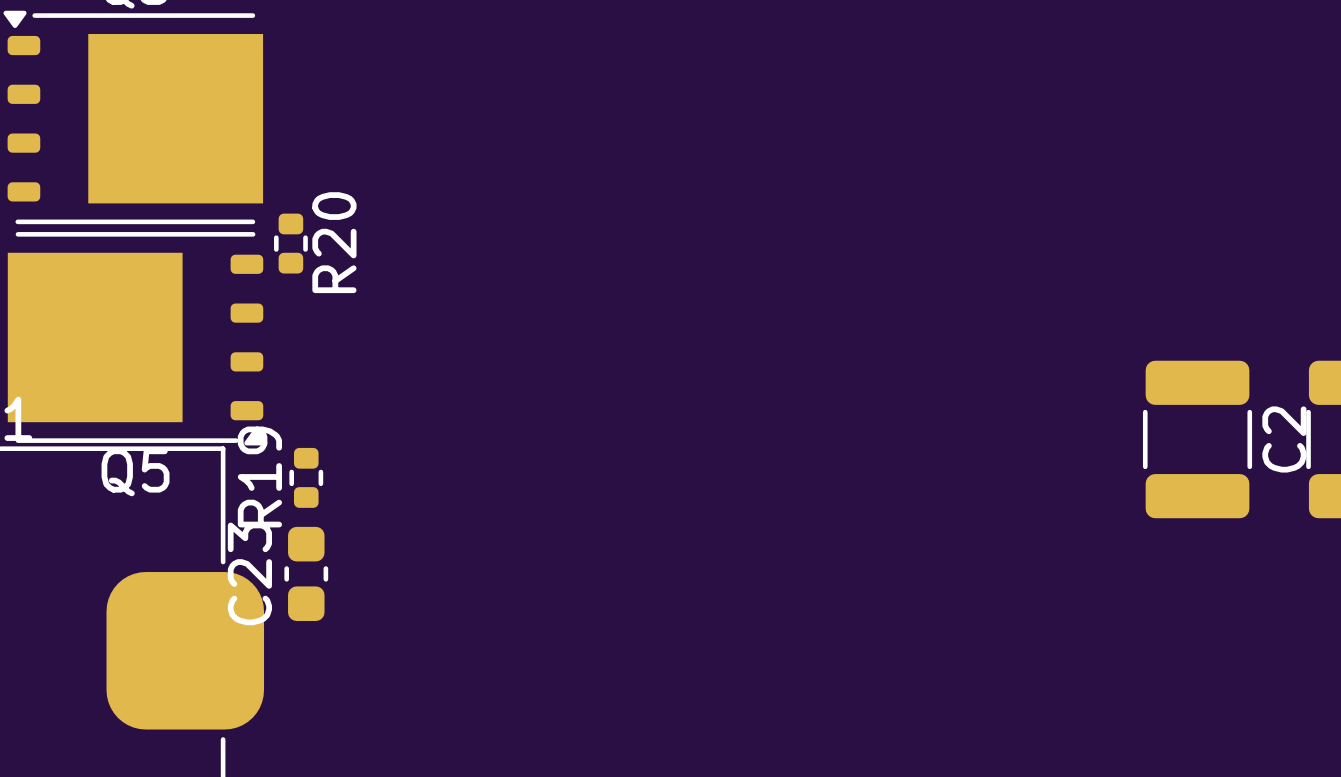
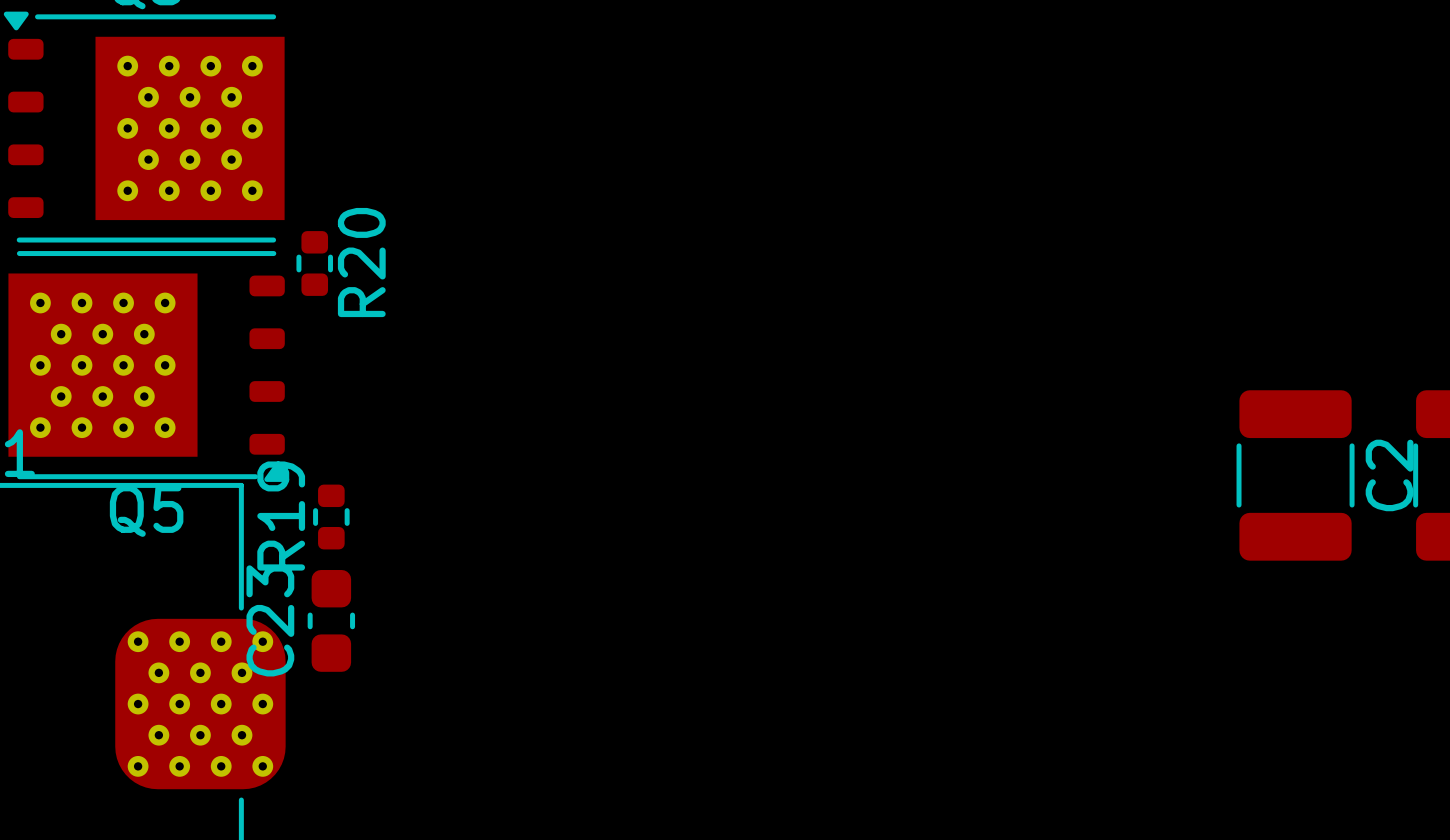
part: none -> (127, 66)
part: none -> (169, 66)
part: none -> (210, 66)
part: none -> (252, 66)
part: none -> (148, 97)
part: none -> (190, 97)
part: none -> (231, 97)
part: none -> (127, 128)
part: none -> (169, 128)
part: none -> (210, 128)
part: none -> (252, 128)
part: none -> (148, 159)
part: none -> (190, 159)
part: none -> (231, 159)
part: none -> (127, 190)
part: none -> (169, 190)
part: none -> (210, 190)
part: none -> (252, 190)
part: none -> (40, 302)
part: none -> (81, 302)
part: none -> (123, 302)
part: none -> (165, 302)
part: none -> (61, 334)
part: none -> (102, 334)
part: none -> (144, 334)
part: none -> (40, 365)
part: none -> (81, 365)
part: none -> (123, 365)
part: none -> (165, 365)
part: none -> (61, 396)
part: none -> (102, 396)
part: none -> (144, 396)
part: none -> (40, 427)
part: none -> (81, 427)
part: none -> (123, 427)
part: none -> (165, 427)
part: none -> (138, 641)
part: none -> (179, 641)
part: none -> (221, 641)
part: none -> (262, 641)
part: none -> (158, 672)
part: none -> (200, 672)
part: none -> (242, 672)
part: none -> (138, 704)
part: none -> (179, 704)
part: none -> (221, 704)
part: none -> (262, 704)
part: none -> (158, 735)
part: none -> (200, 735)
part: none -> (242, 735)
part: none -> (138, 766)
part: none -> (179, 766)
part: none -> (221, 766)
part: none -> (262, 766)

